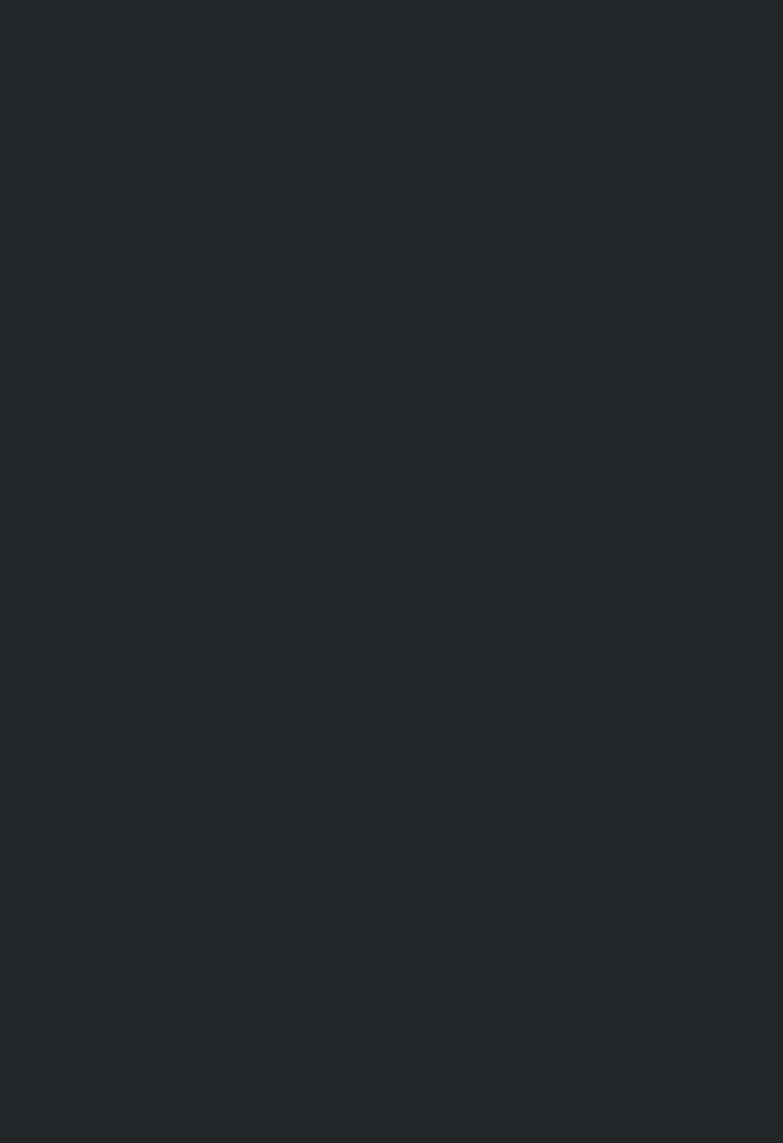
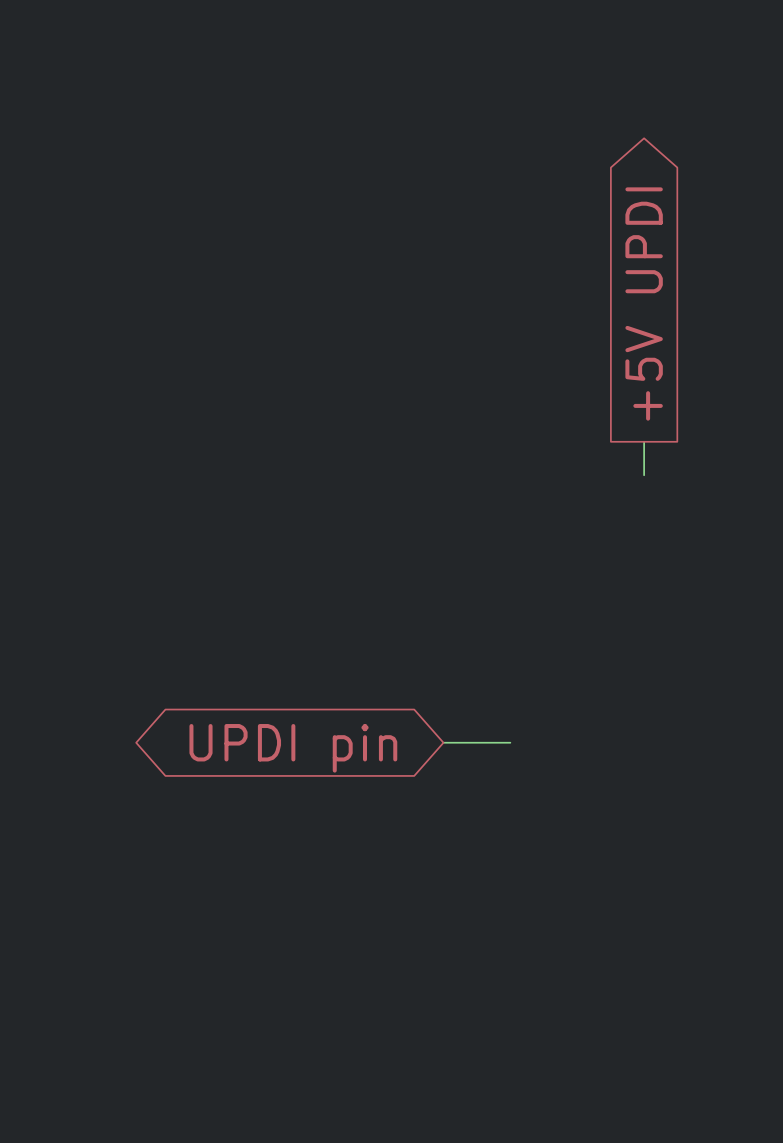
global label: none -> +5V UPDI (644, 304)
wire: none -> (644, 441) (644, 475)
wire: none -> (443, 742) (510, 742)
global label: none -> UPDI pin (293, 748)

